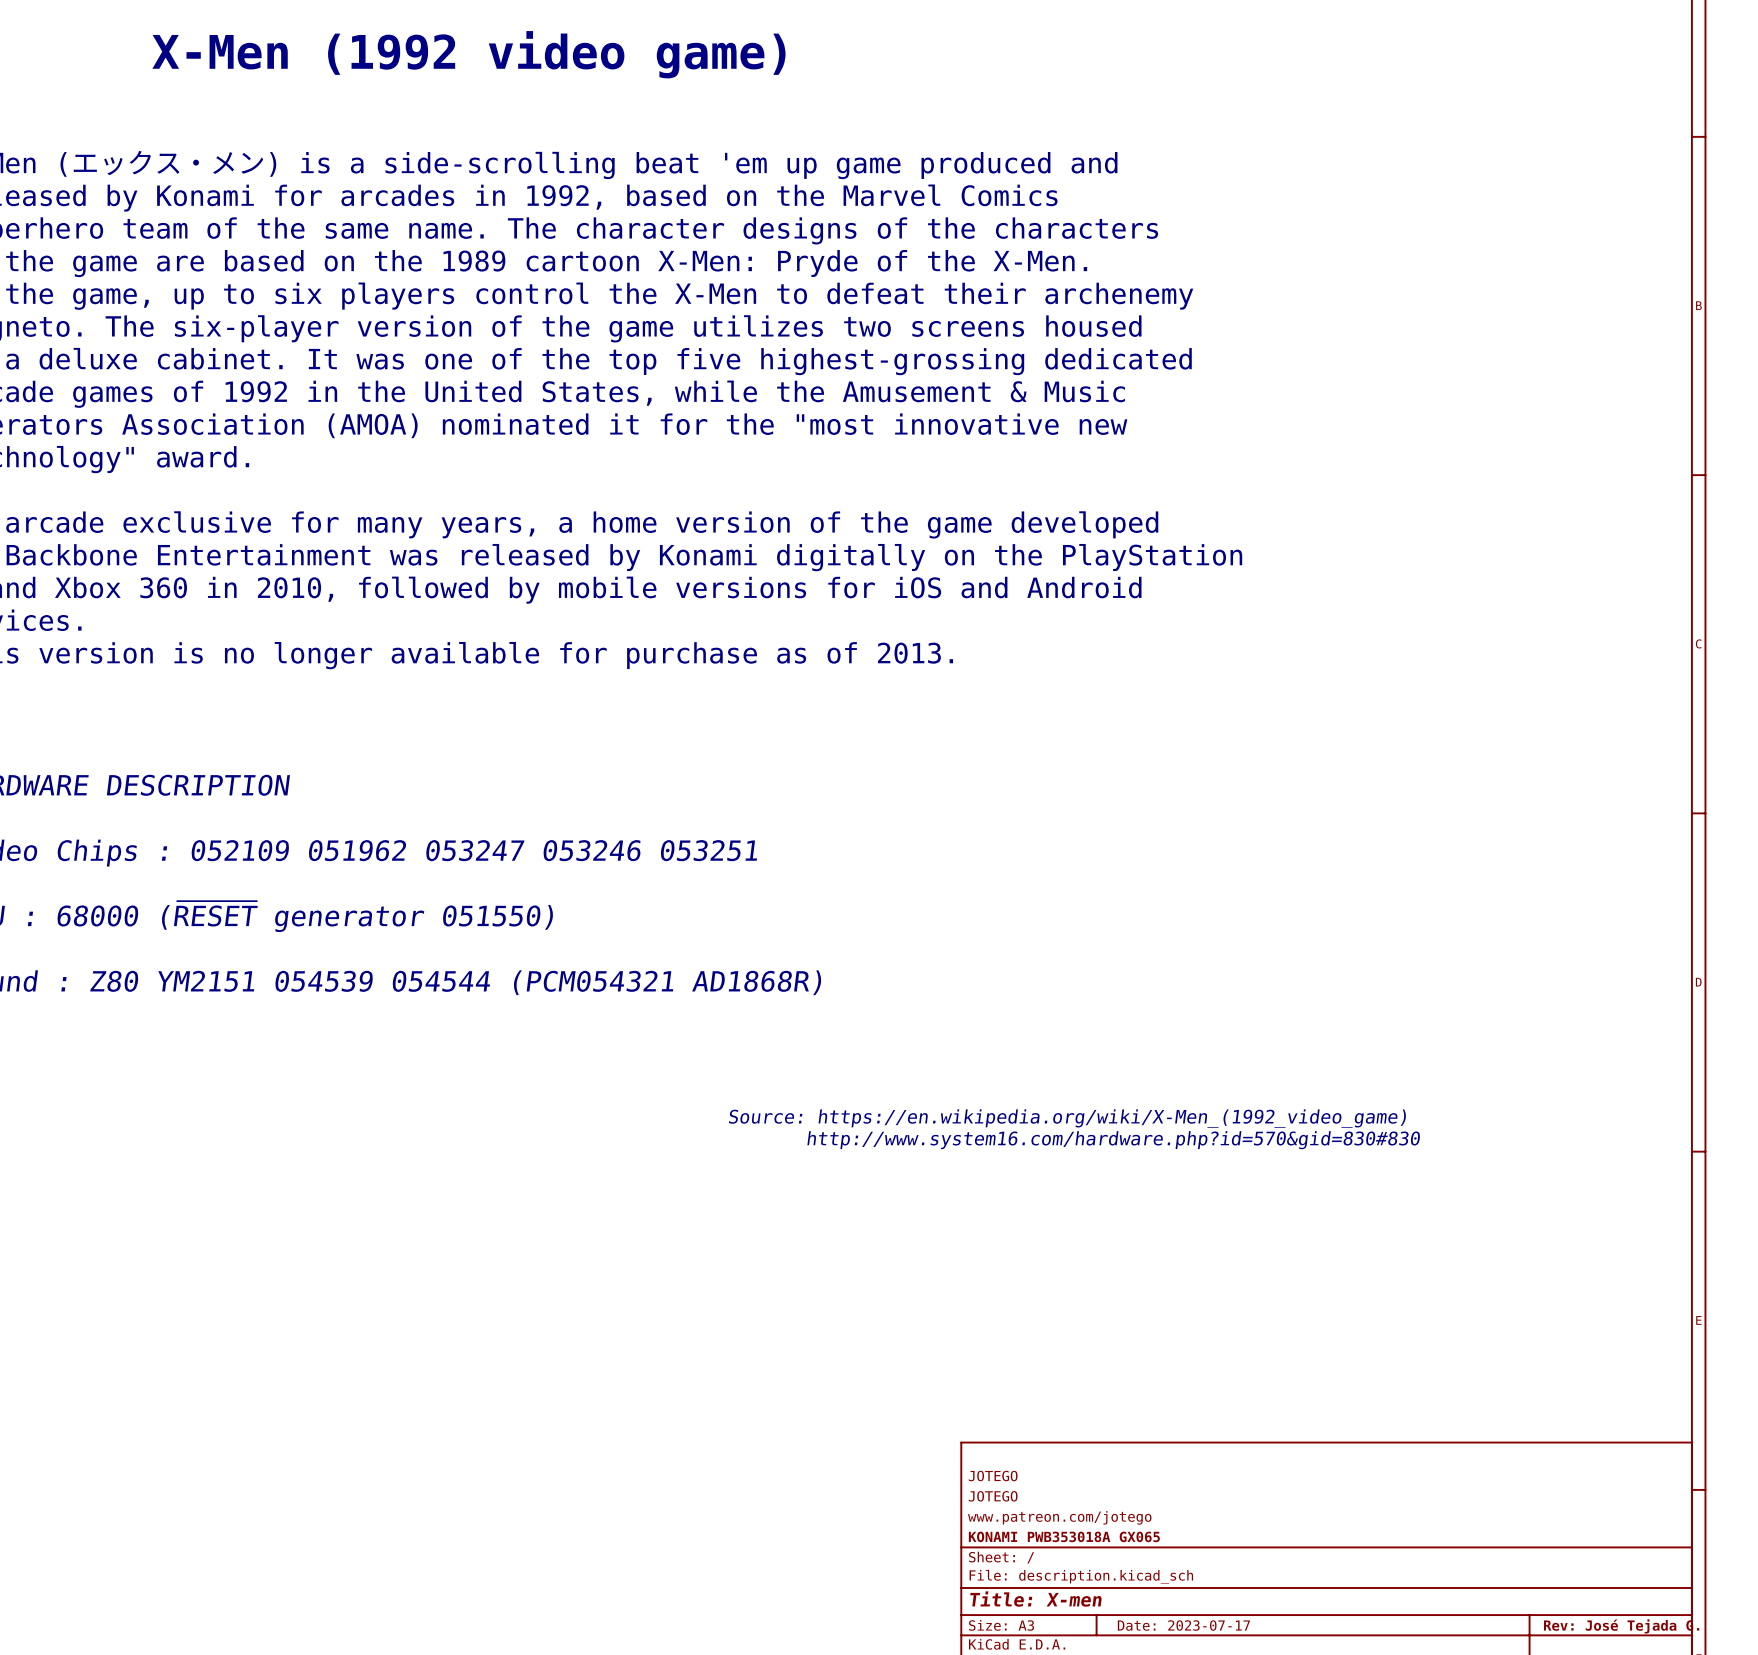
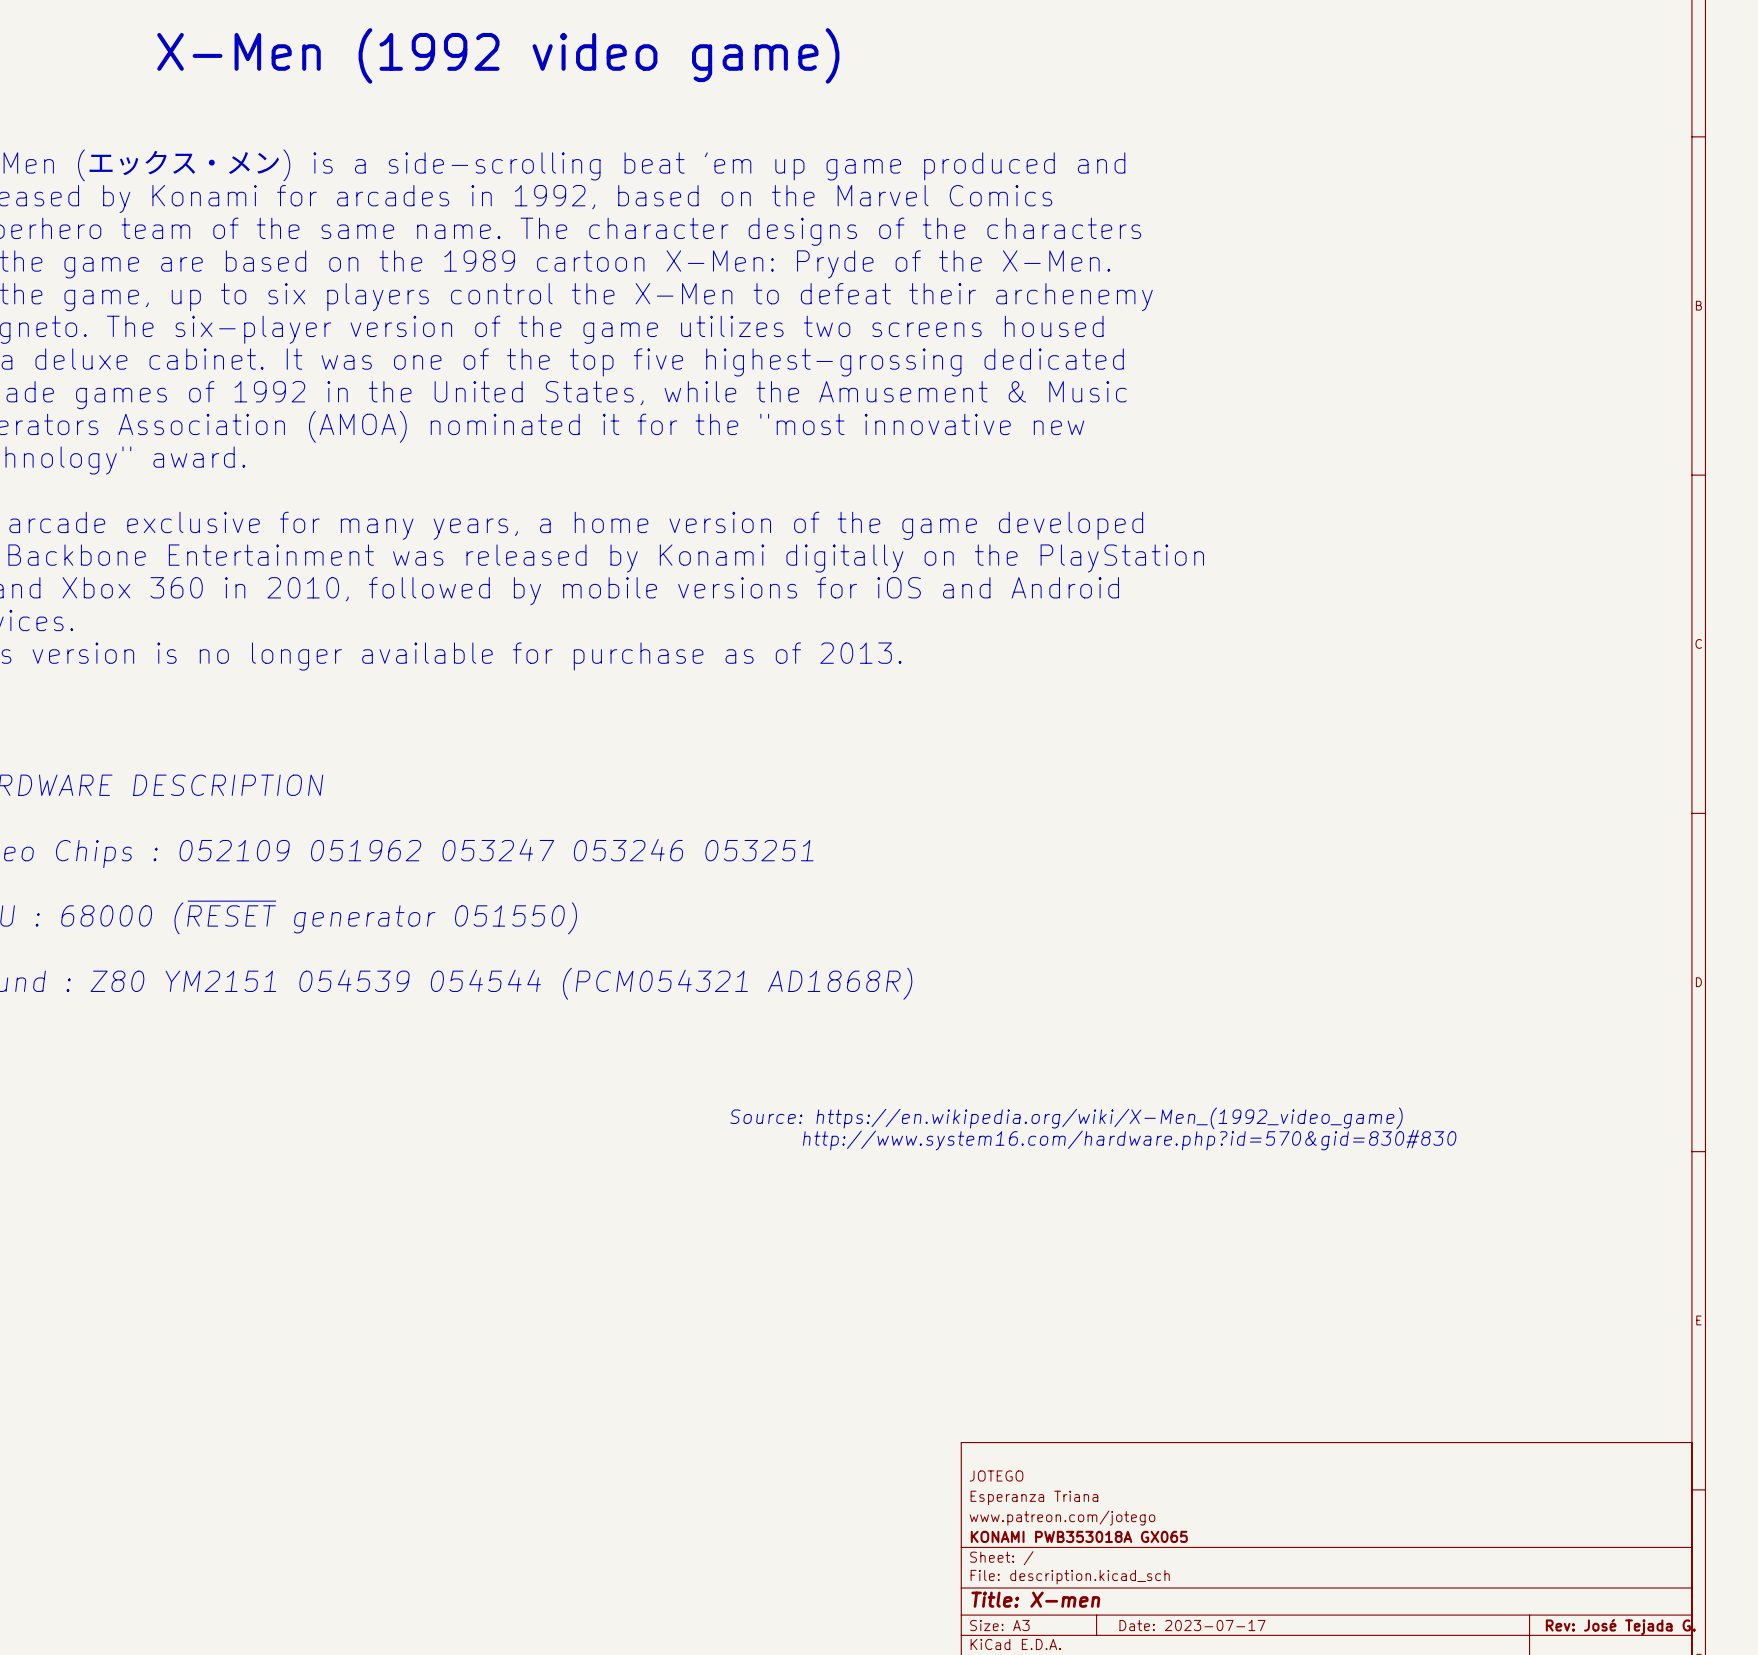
title block: JOTEGO (993, 1496) -> Esperanza Triana (1034, 1497)

